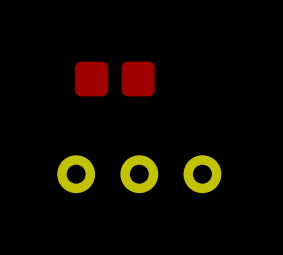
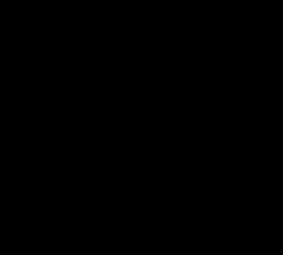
part: (114, 78) -> none
part: (139, 174) -> none

